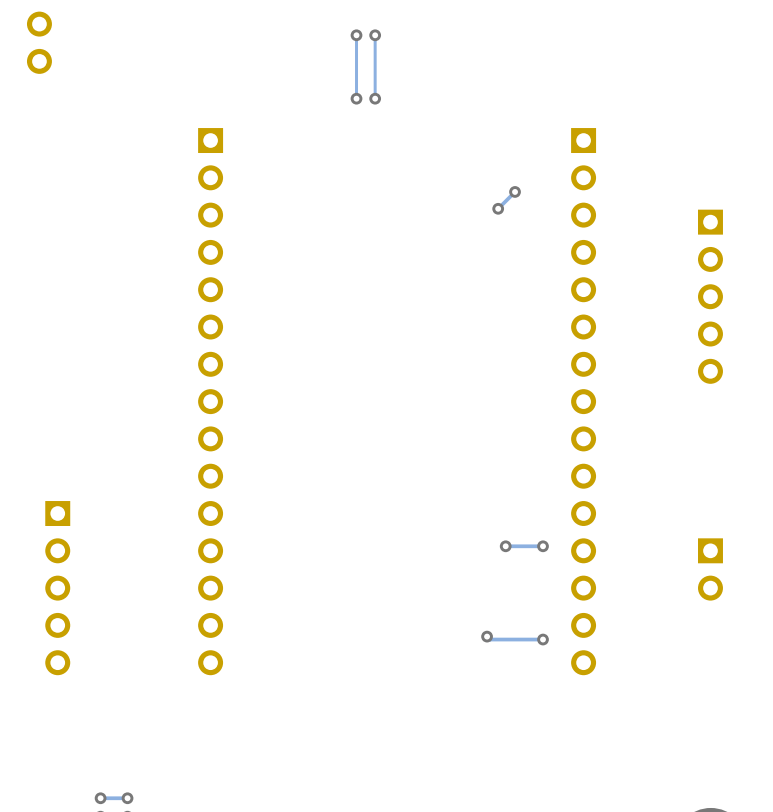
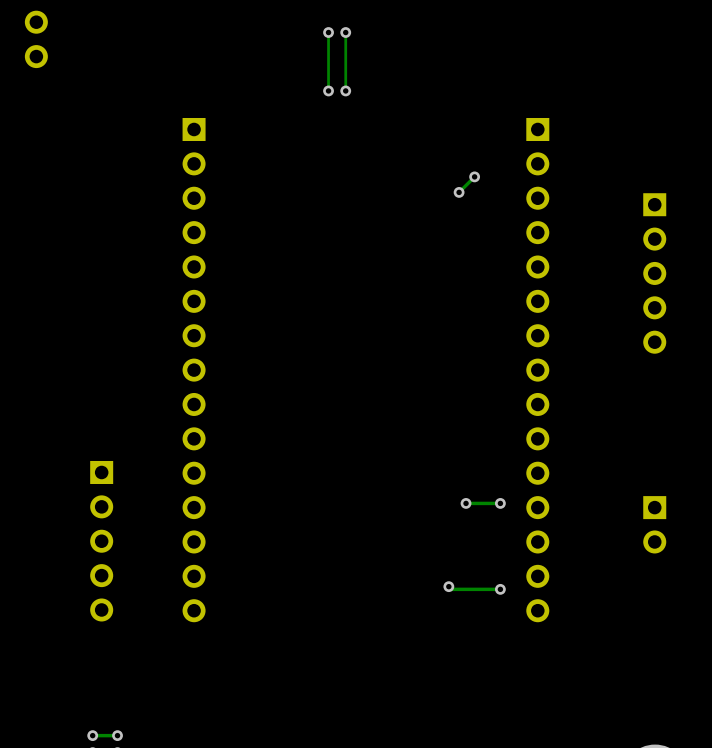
part position: (57, 588) -> (101, 541)

